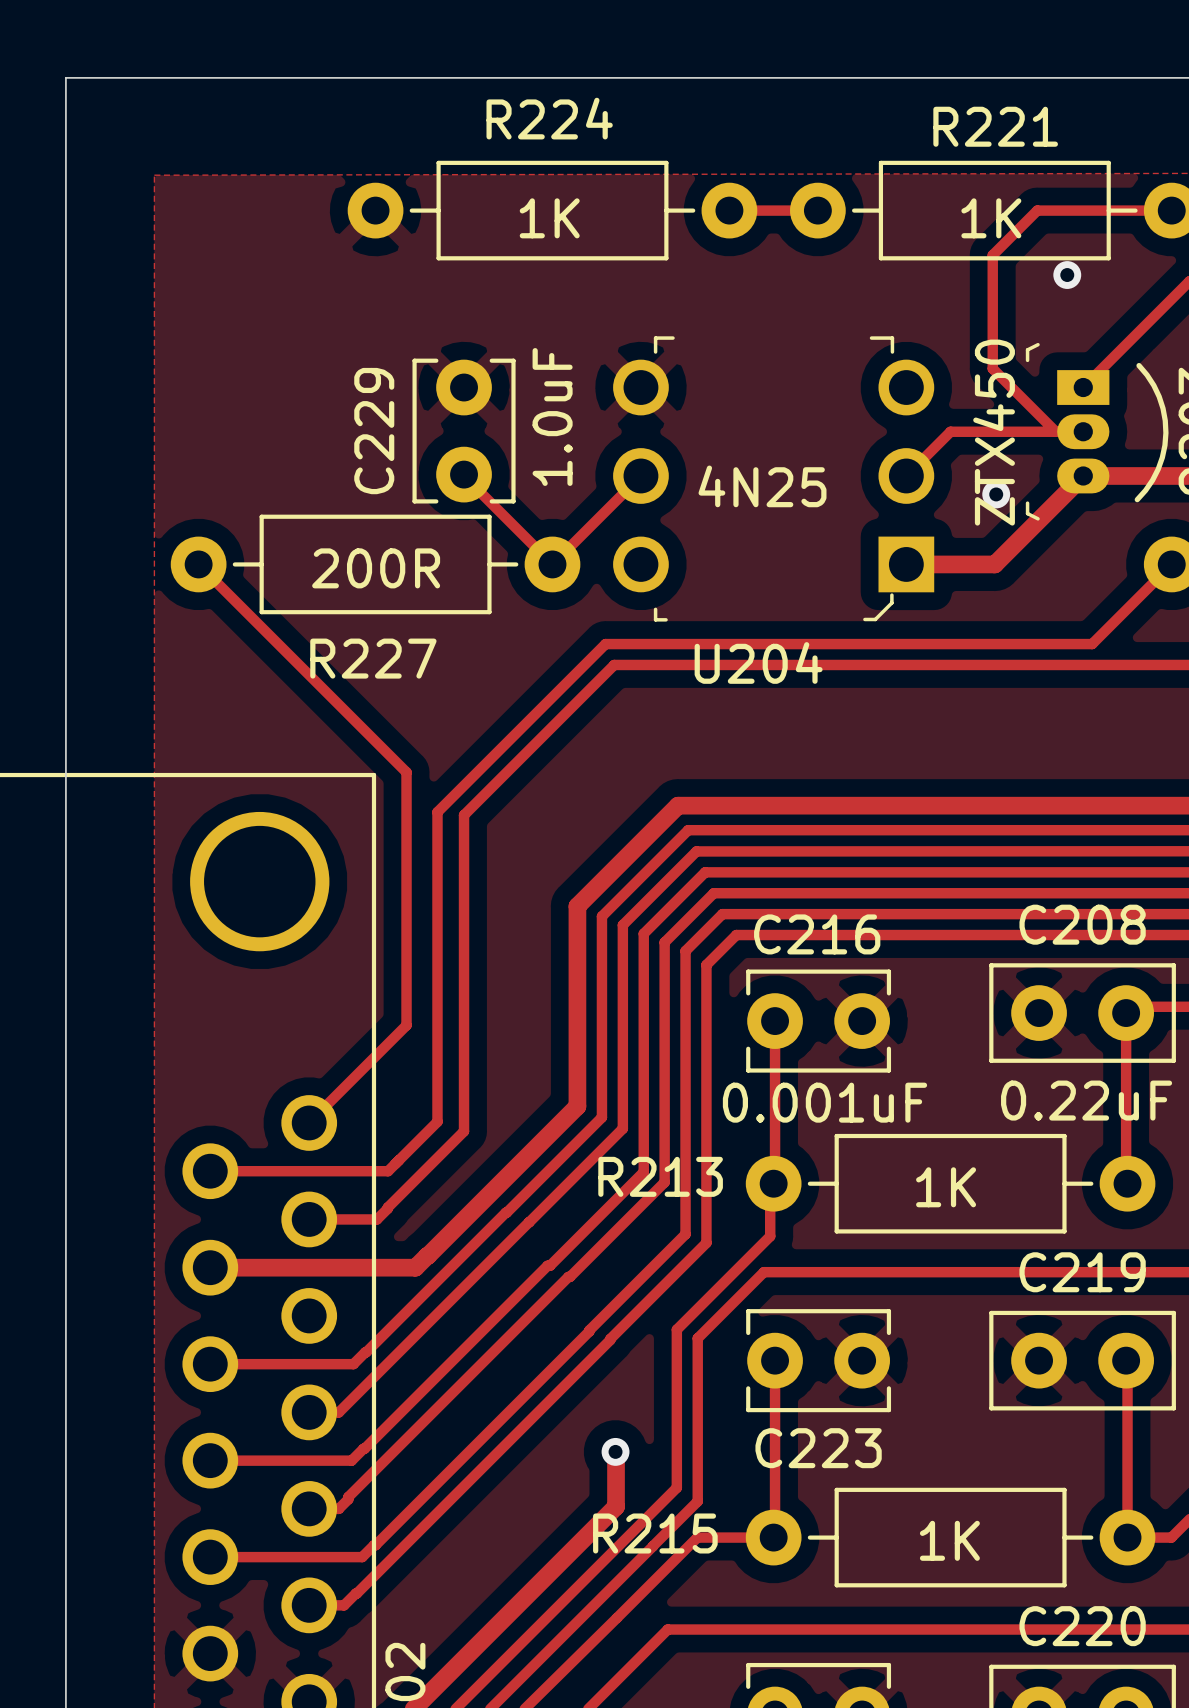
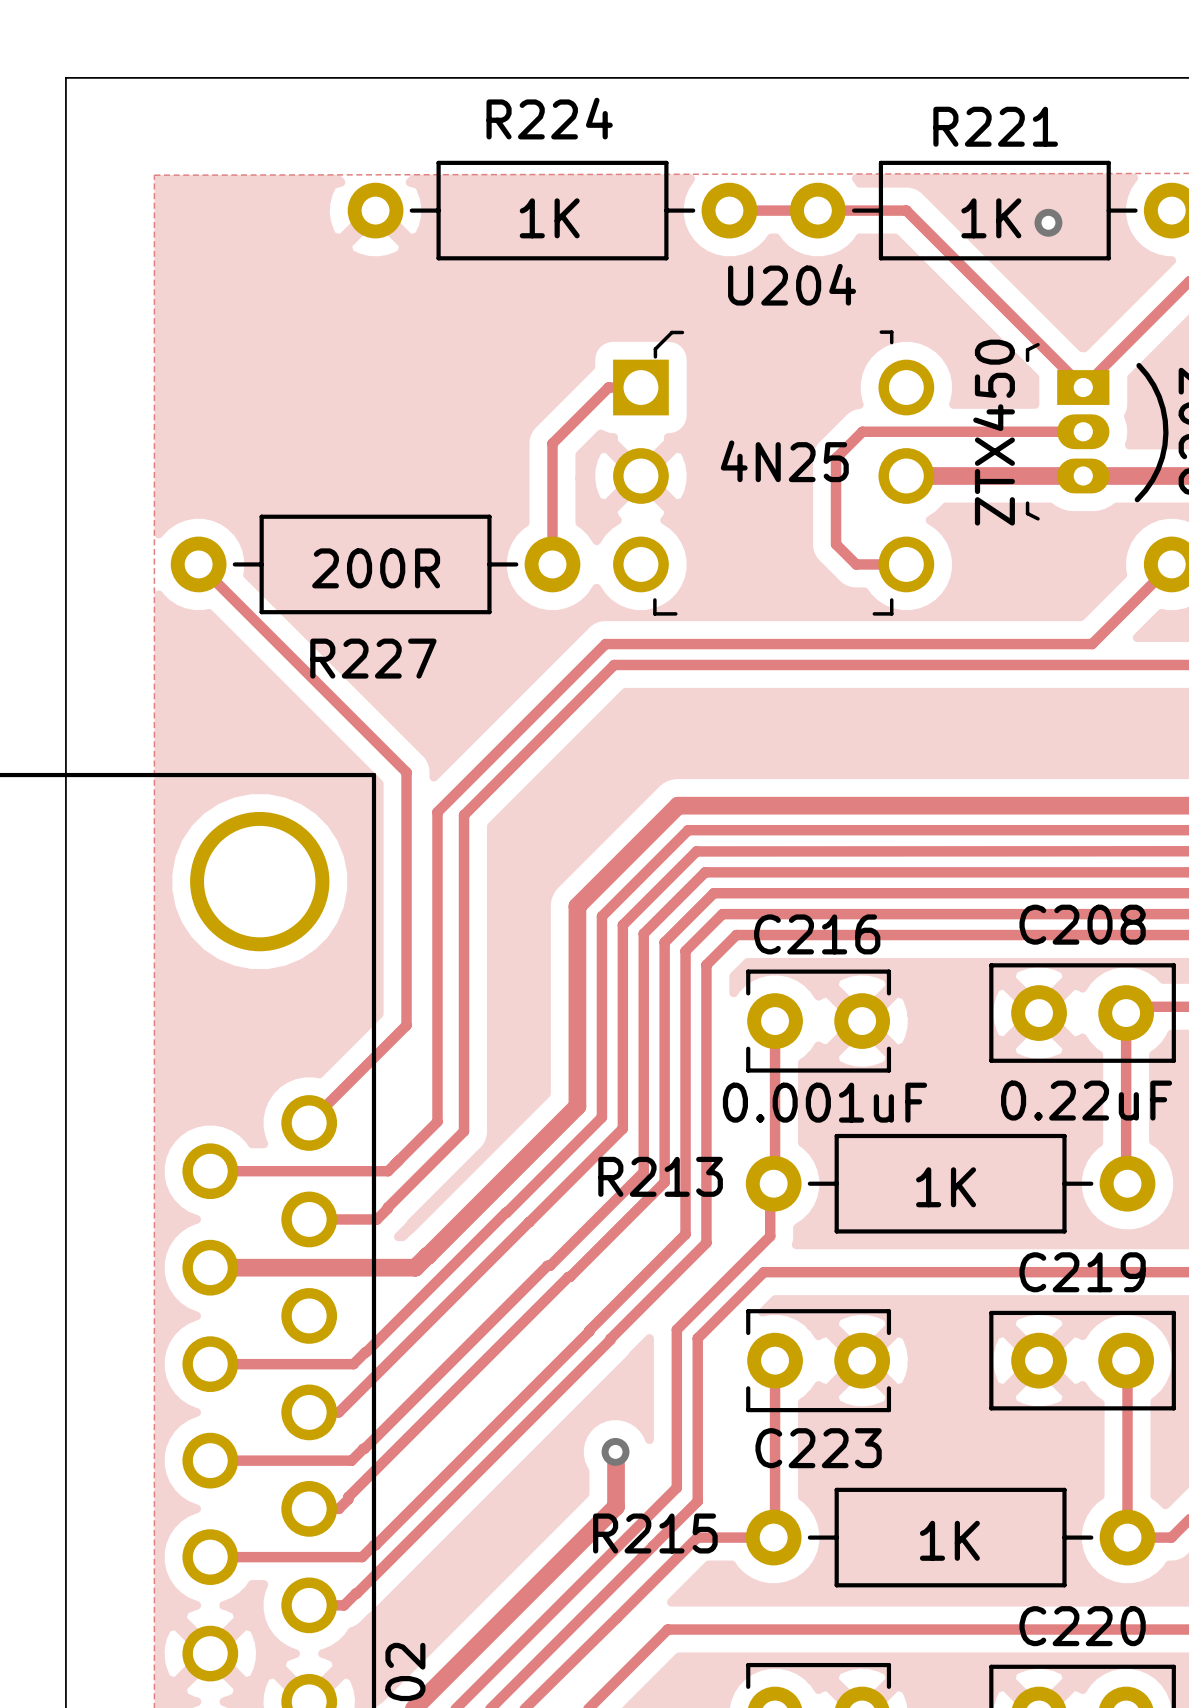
track: none -> (817, 210) (906, 210) (1083, 387)
track: (1171, 210) (1037, 210) (992, 255) (992, 368) (1055, 431) -> none
via position: (1067, 275) -> (1048, 222)
track: none -> (640, 387) (608, 387) (552, 443) (552, 564)
C229: 1.0uF (464, 431) -> none
track: (950, 431) (906, 475) -> (950, 431) (862, 431) (836, 458) (836, 544) (856, 564) (906, 564)
track: (464, 474) (552, 564) (640, 475) -> none
track: (1083, 475) (994, 564) (906, 564) -> (1083, 475) (906, 475)
U204 rotation: 0° (773, 478) -> 180° (773, 473)
via: (996, 494) -> none

